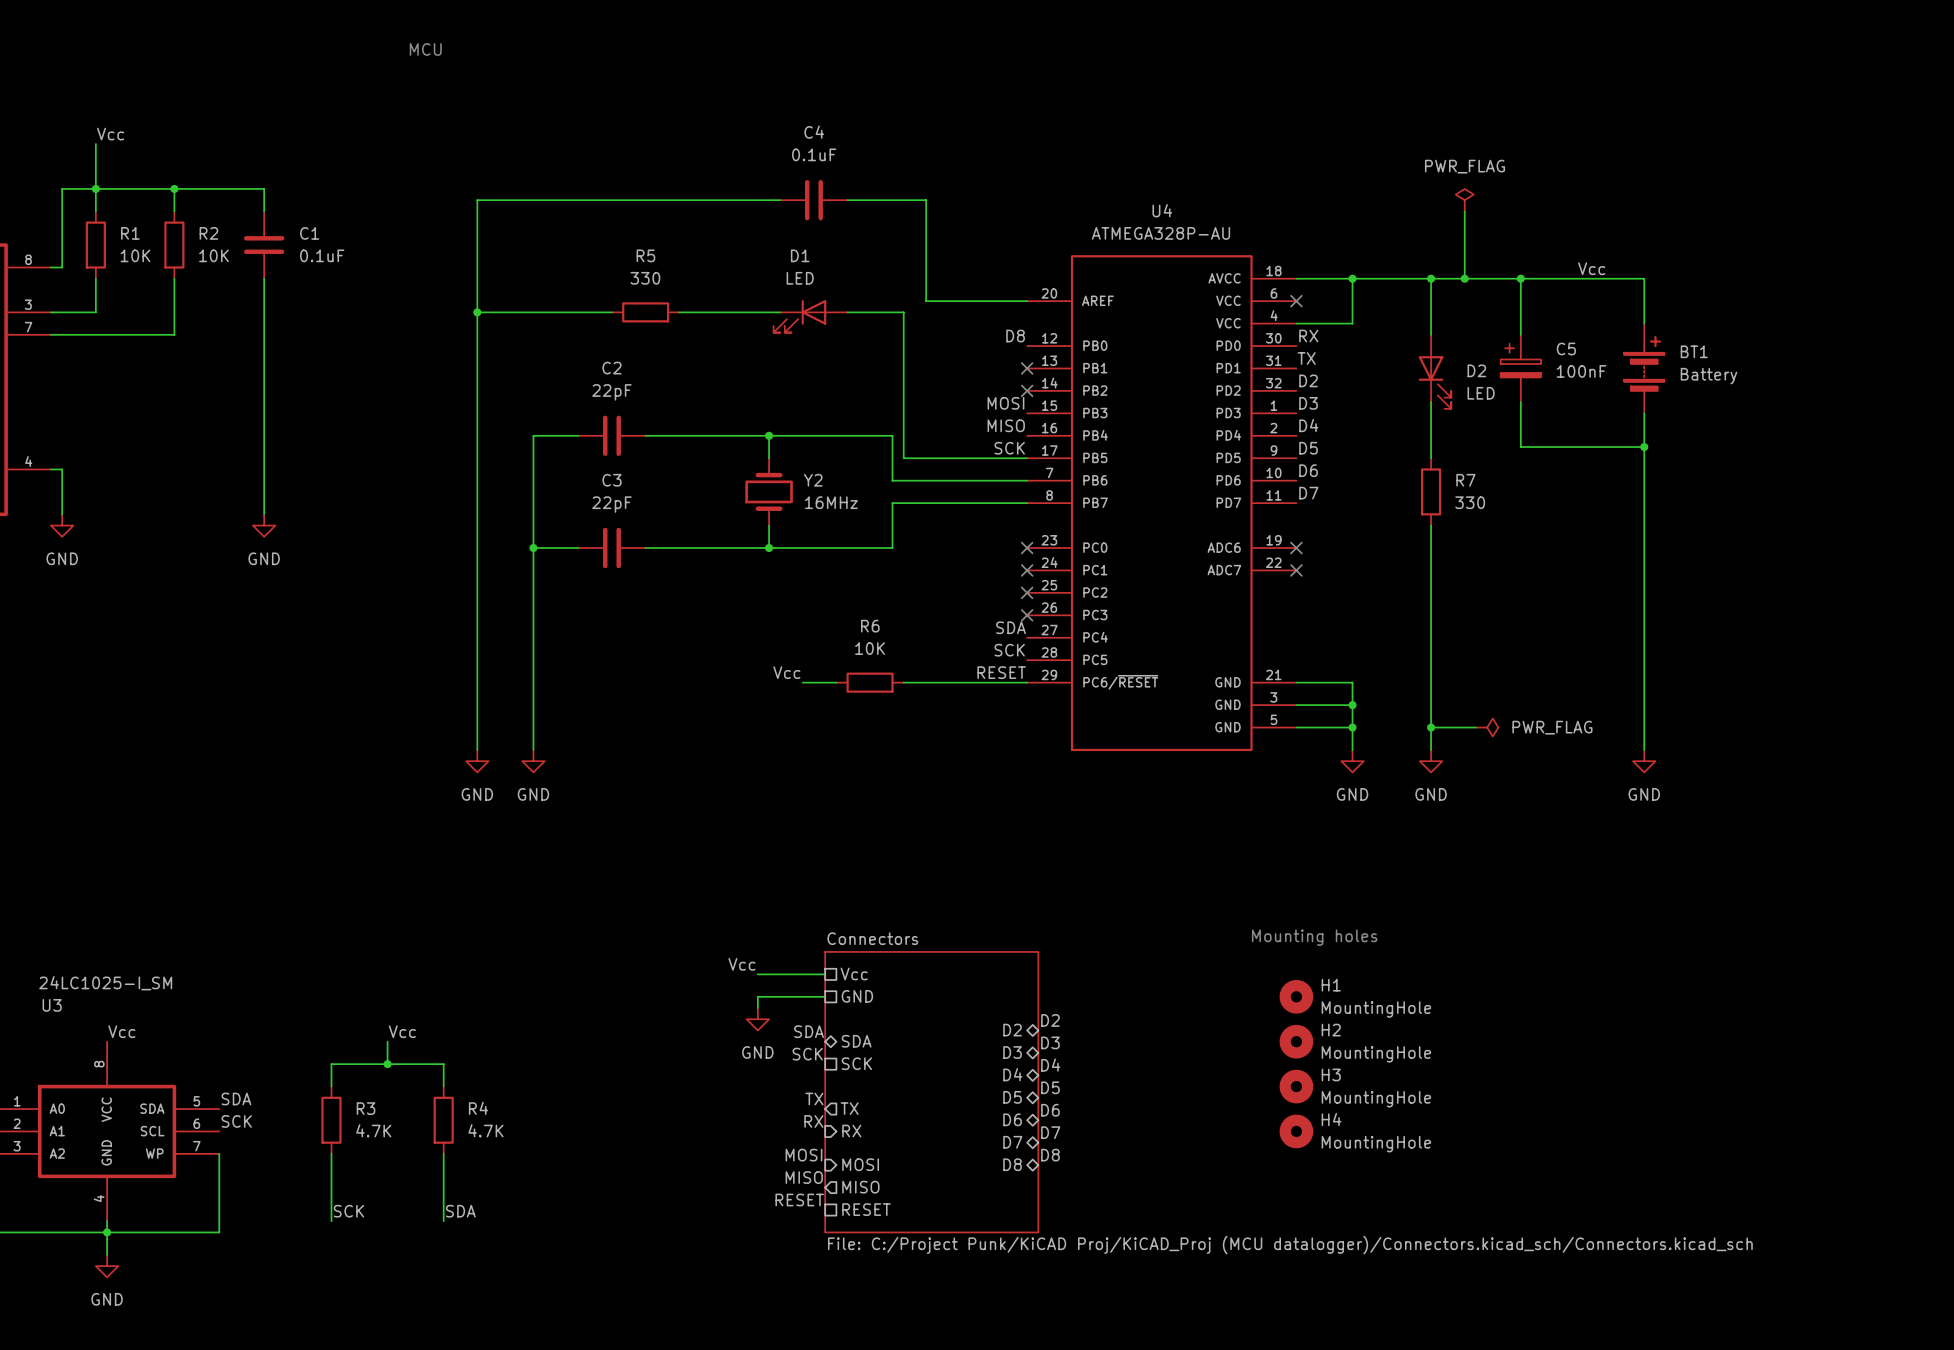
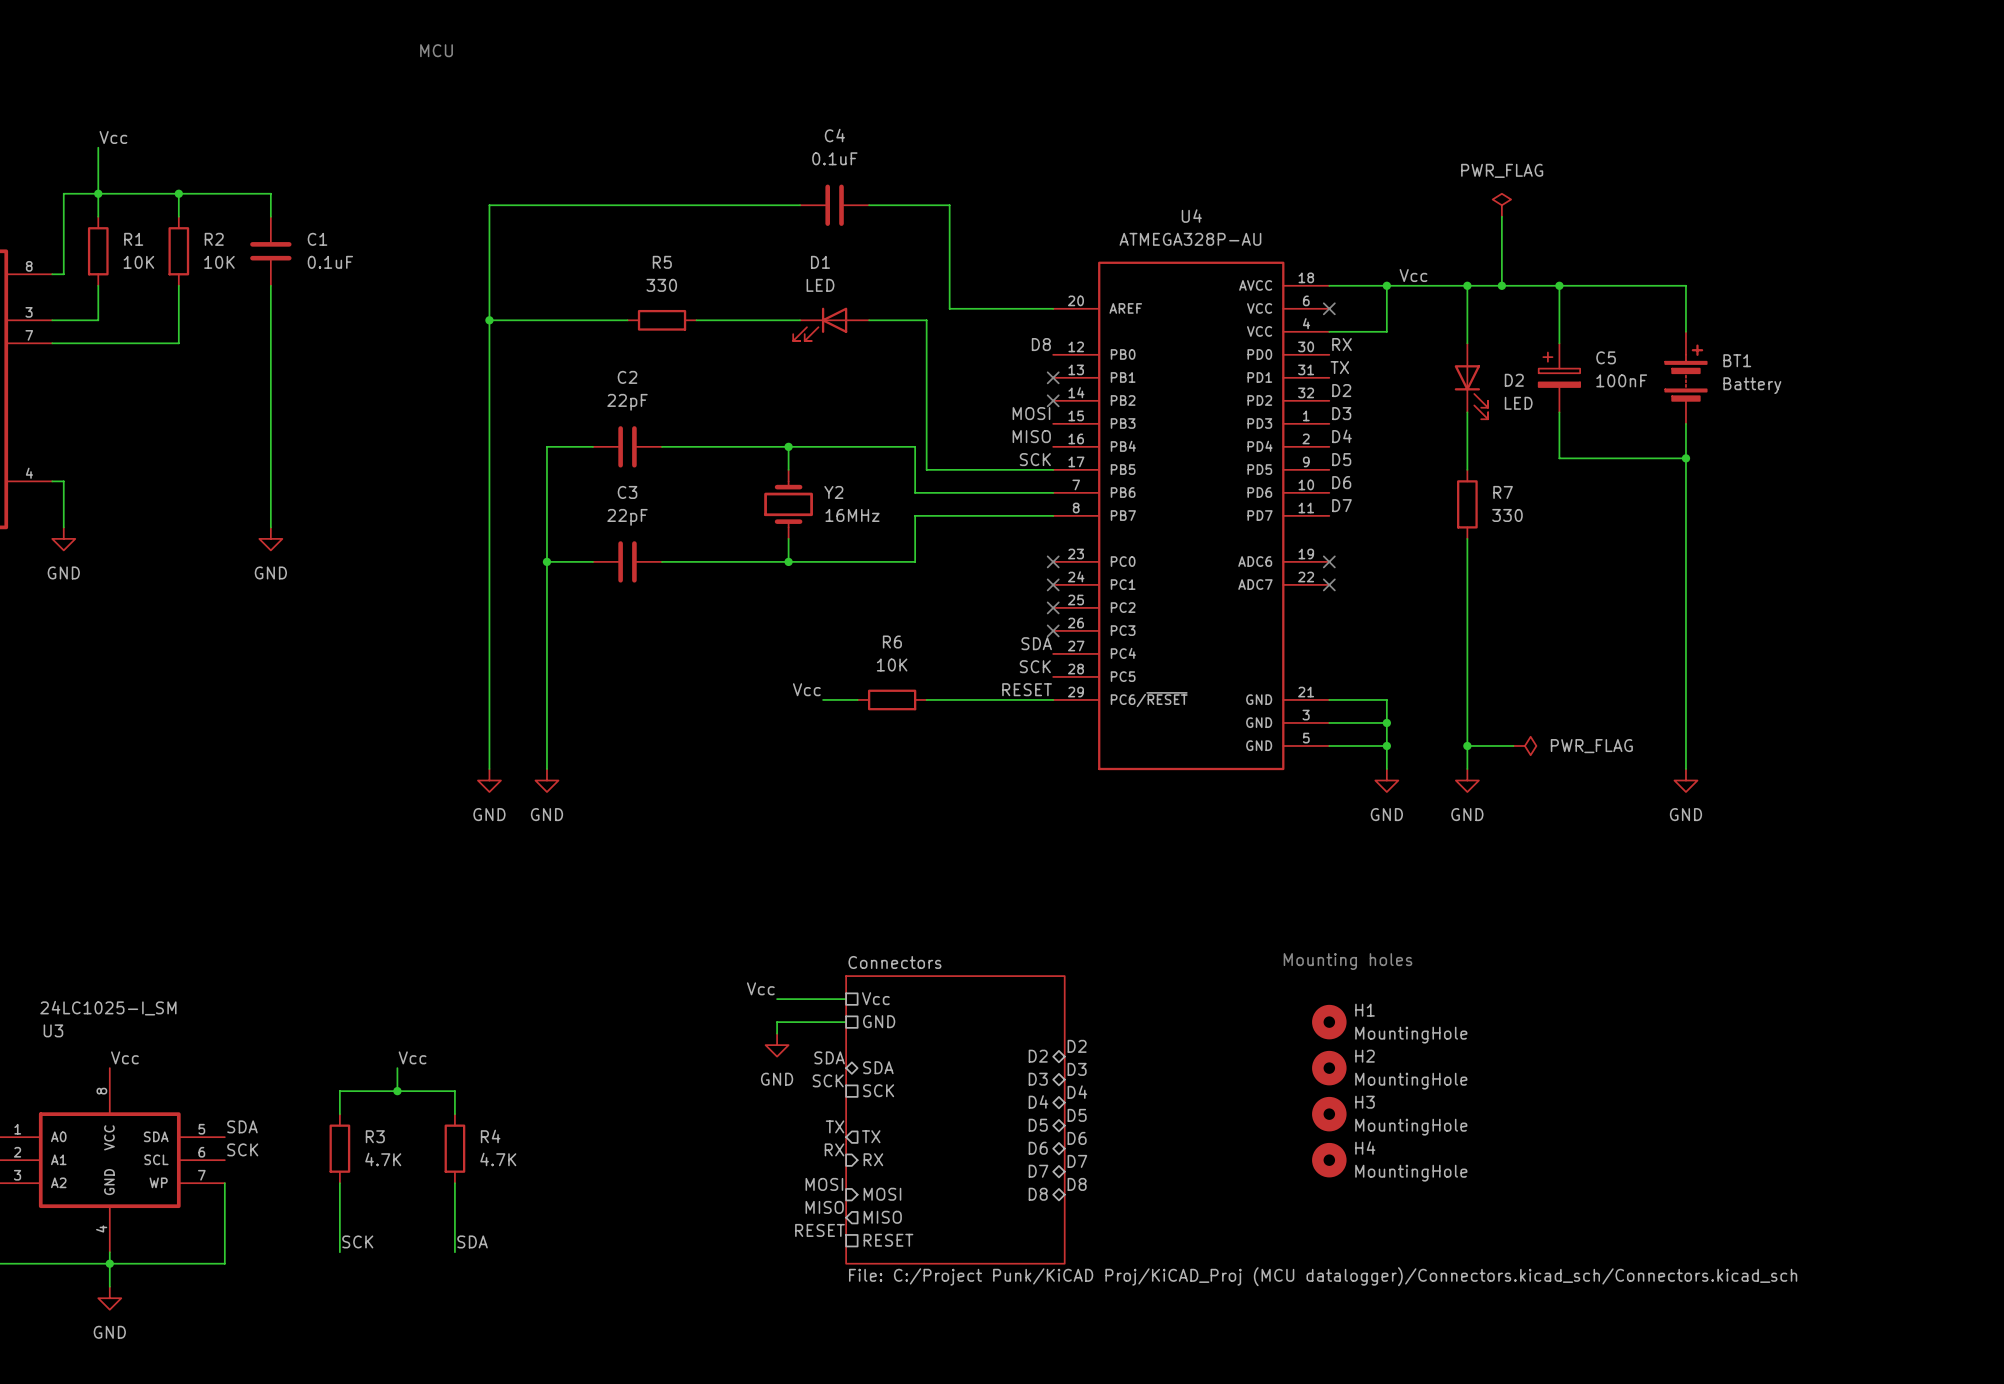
label position: Vcc (1591, 268) -> Vcc (1413, 275)

